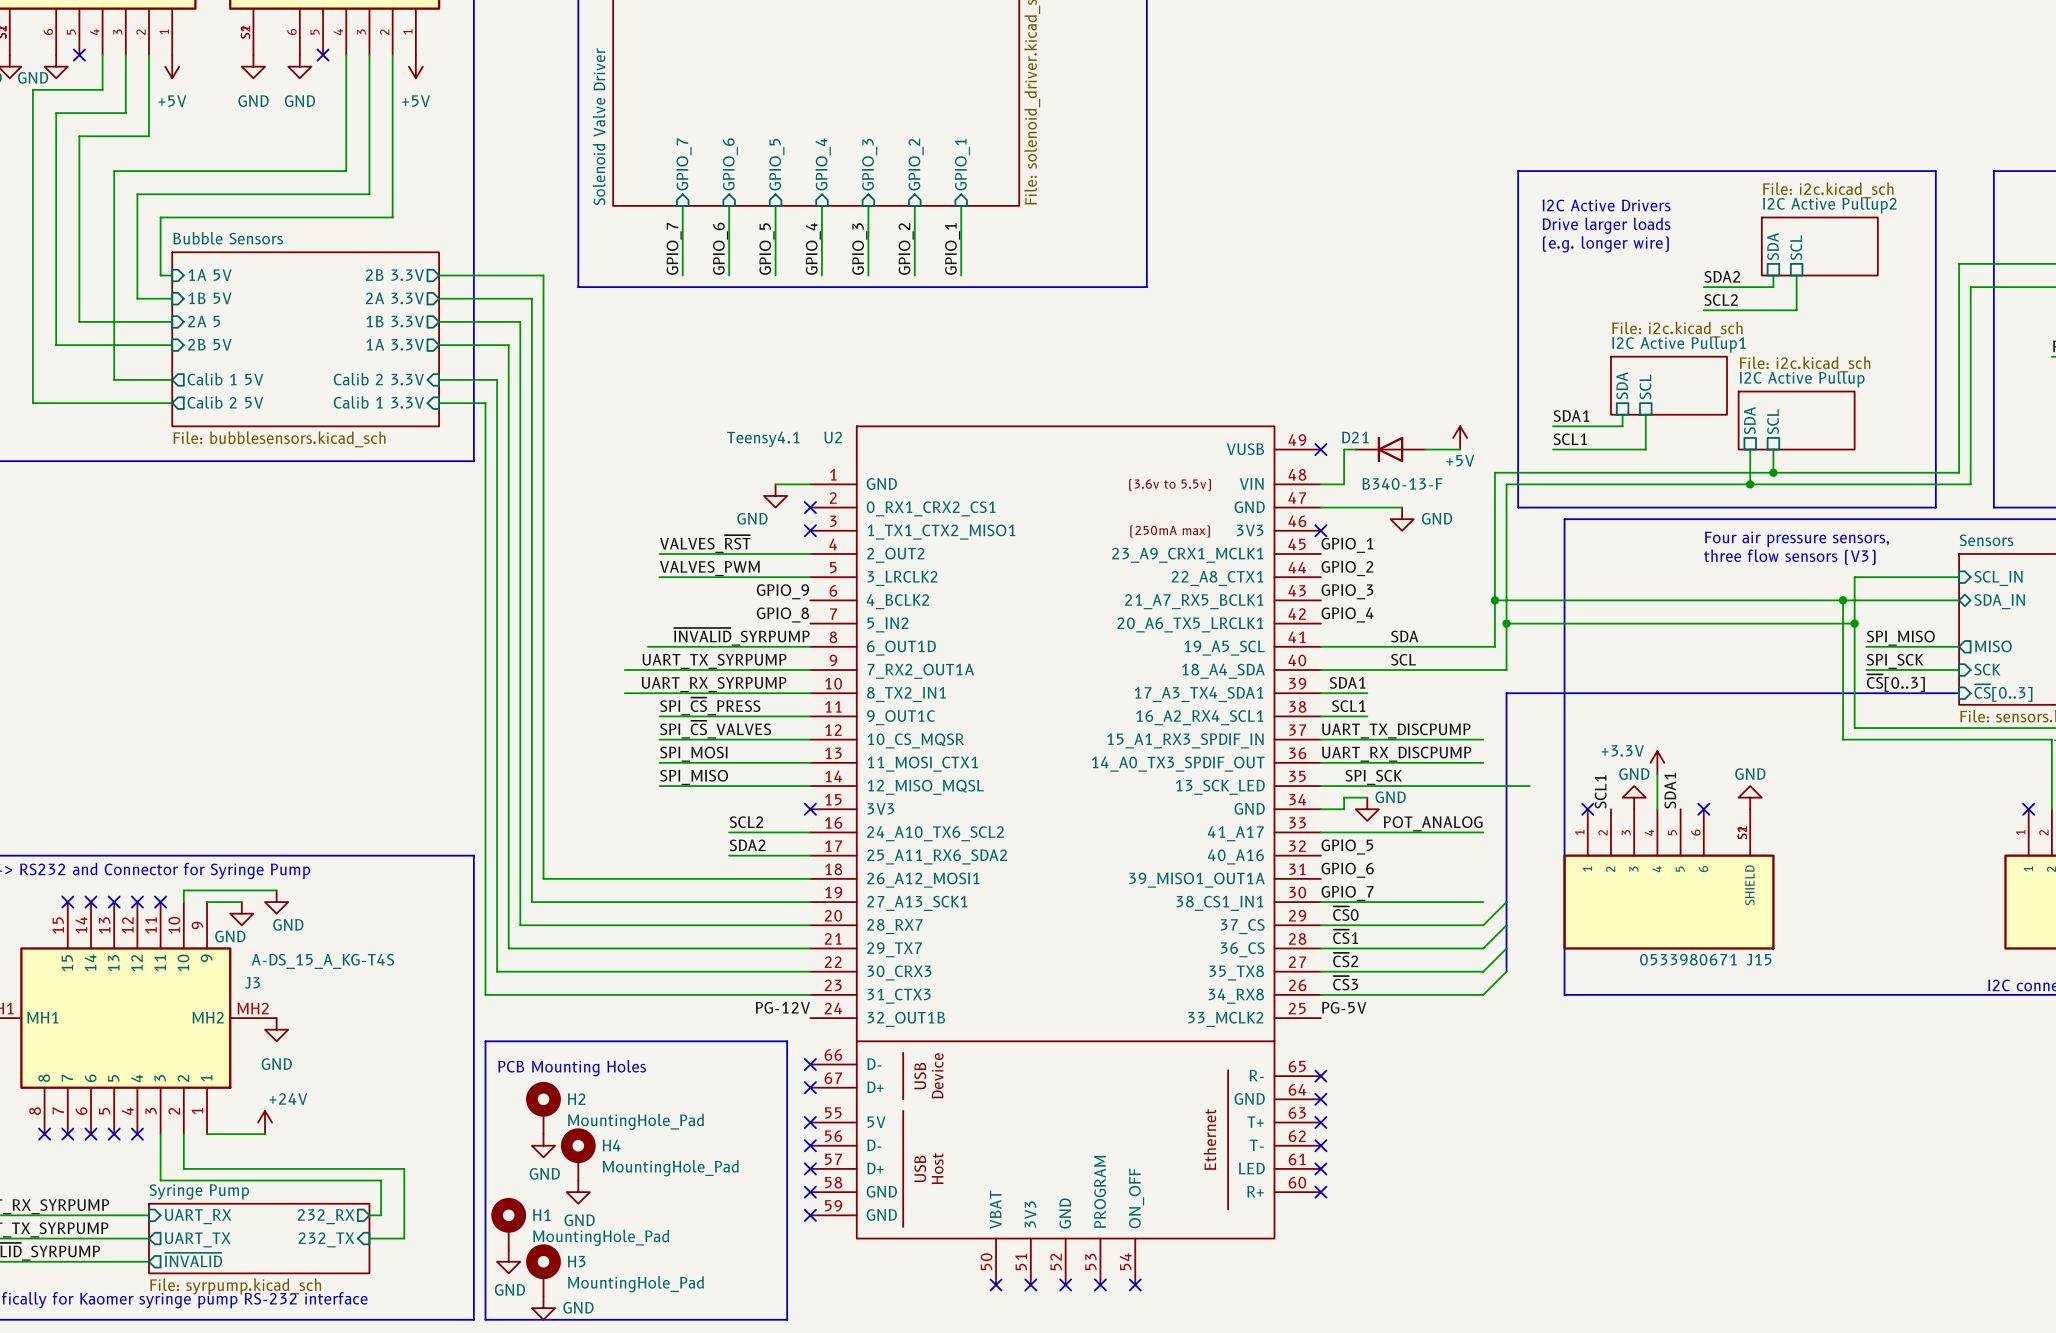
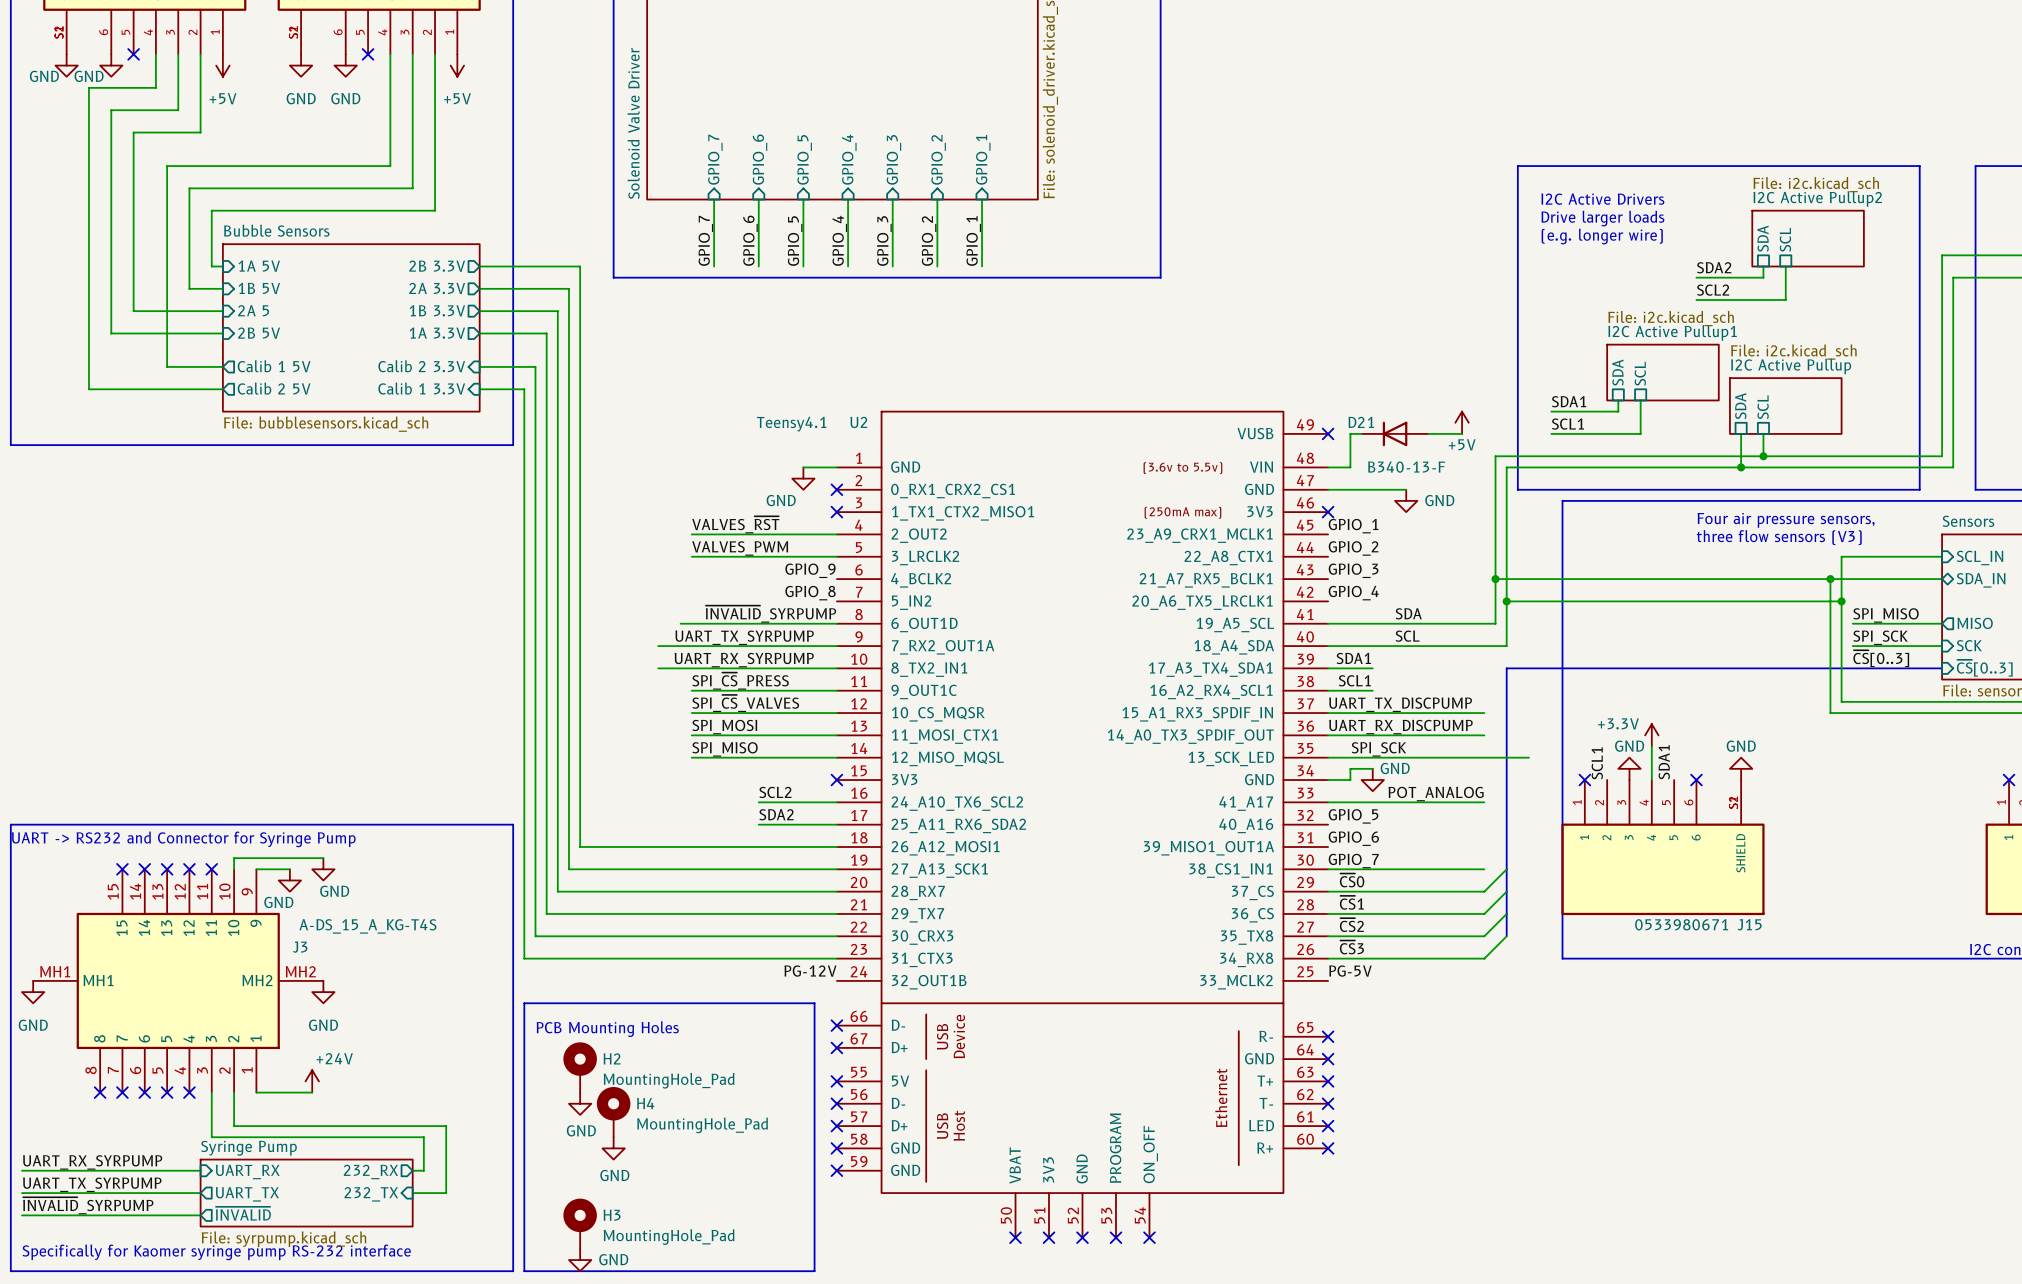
H1: MountingHole_Pad (508, 1224) -> none
power symbol: GND (508, 1261) -> none

